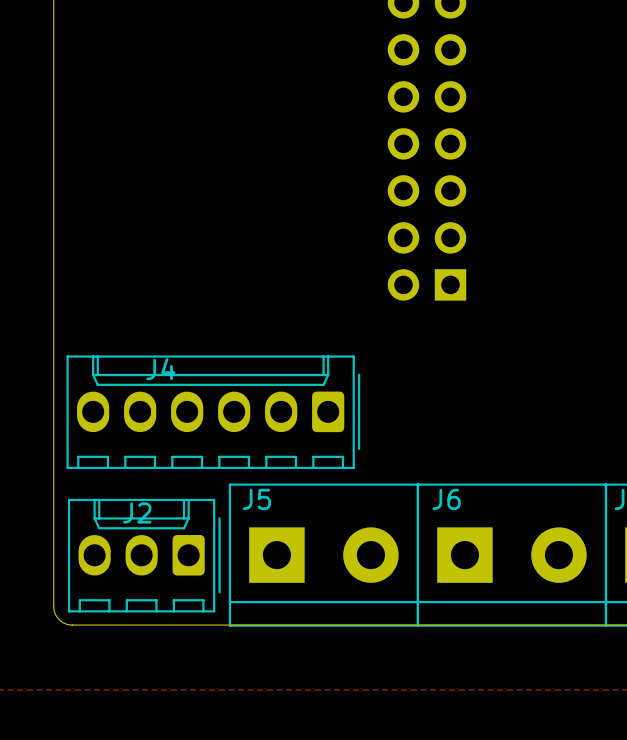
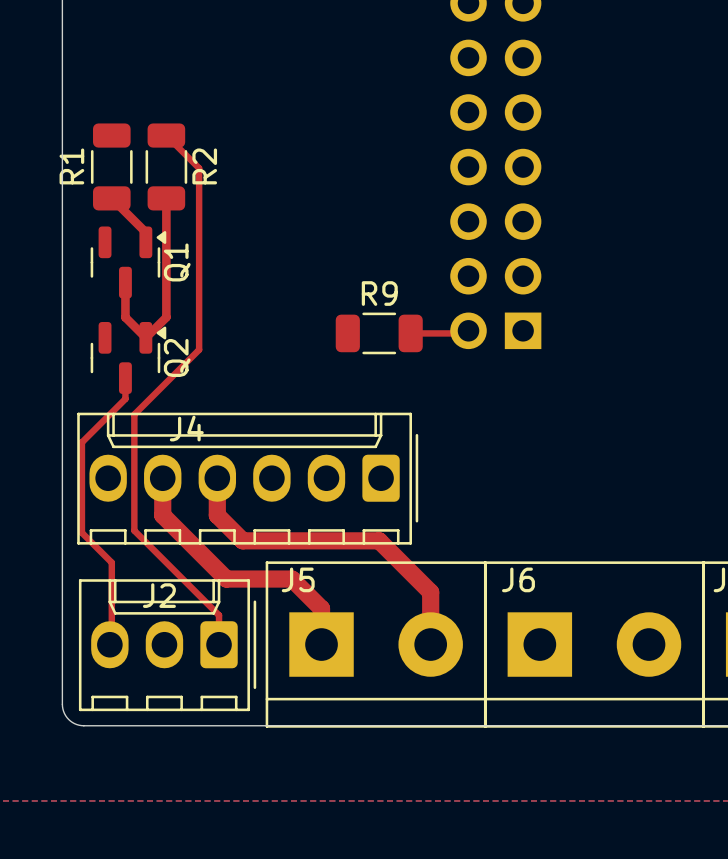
top track: none -> (166, 135) (199, 168) (199, 349) (134, 414) (134, 530) (219, 615) (219, 644)
R1: none -> (111, 166)
R2: none -> (166, 166)
top track: none -> (111, 198) (145, 232) (145, 242)
top track: none -> (166, 198) (166, 317) (145, 337) (125, 317) (125, 282)
Q1: none -> (128, 262)
top track: none -> (468, 330) (465, 333) (410, 333)
R9: none -> (379, 333)
Q2: none -> (128, 357)
top track: none -> (125, 378) (125, 398) (81, 442) (81, 532) (111, 562) (111, 642) (109, 644)
top track: none -> (162, 478) (162, 515) (226, 579) (291, 579) (321, 608) (321, 644)
top track: none -> (217, 478) (217, 515) (242, 540) (379, 540) (430, 592) (430, 644)

